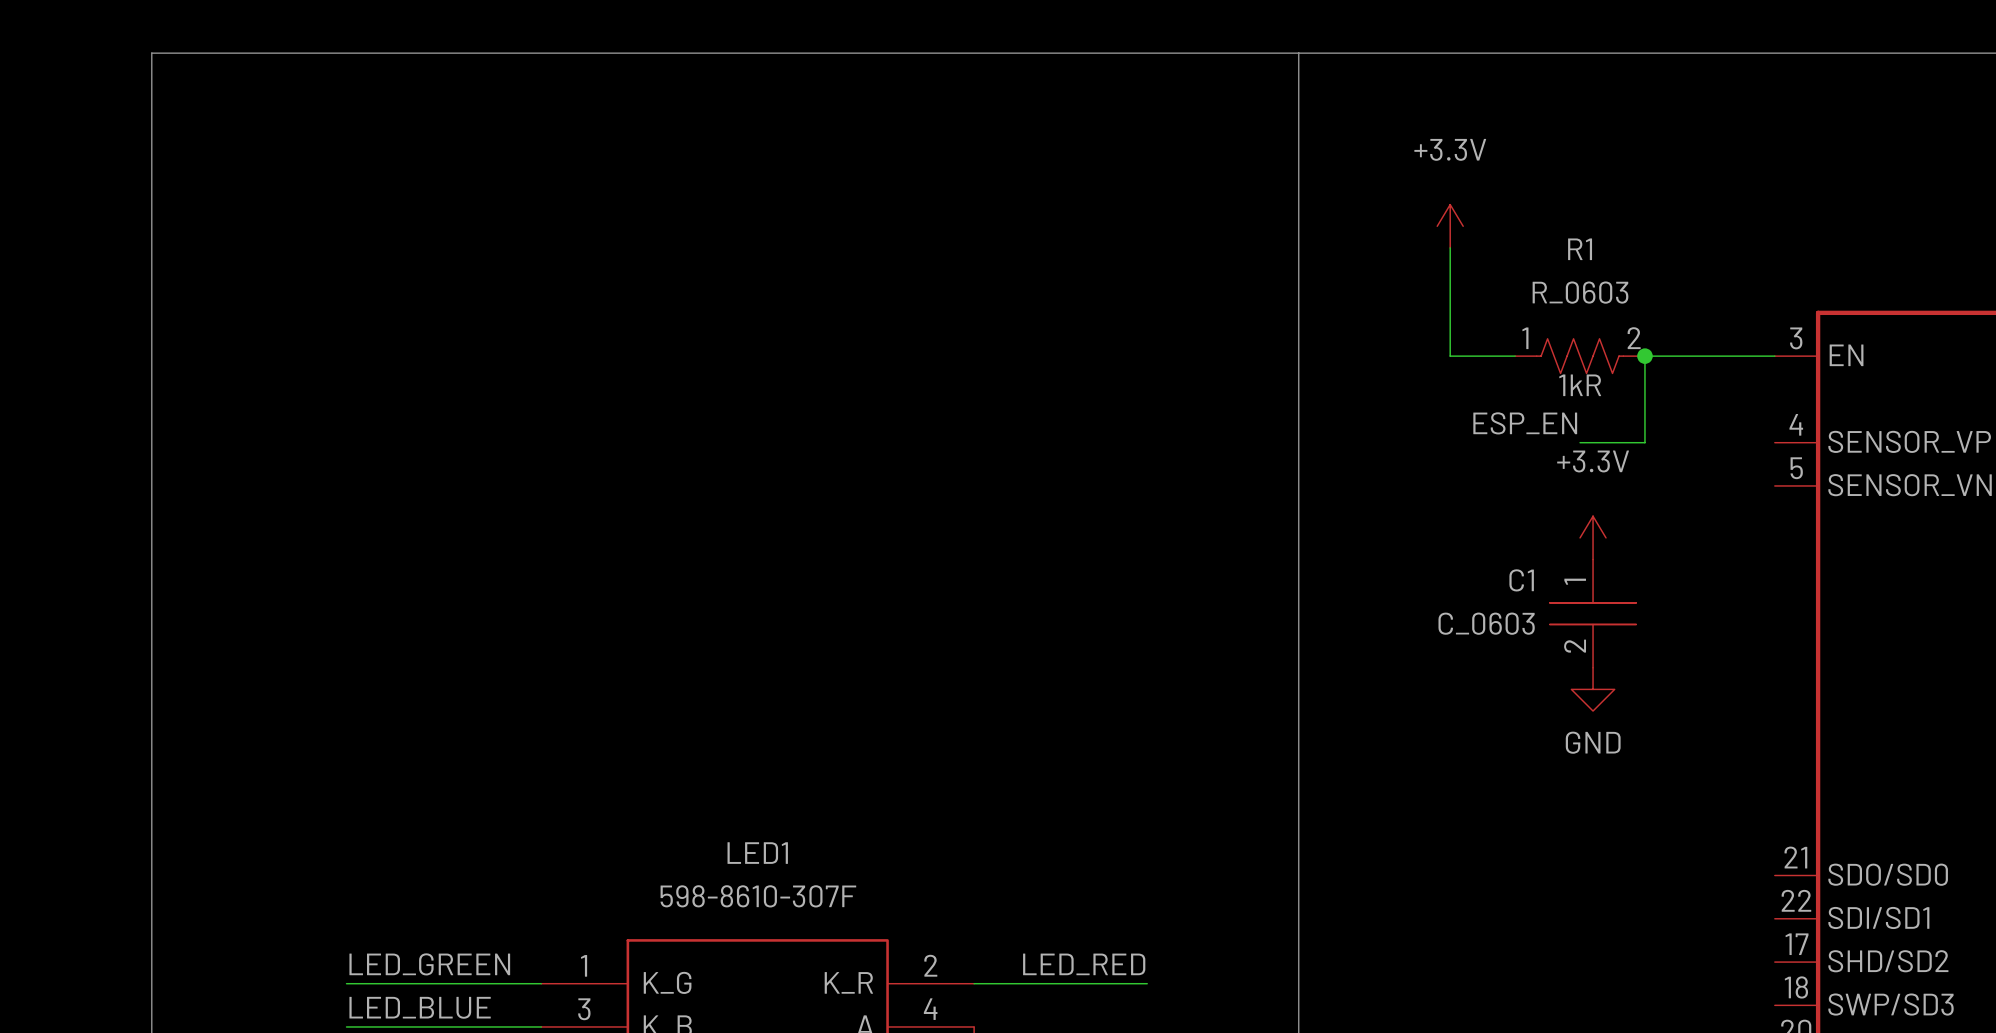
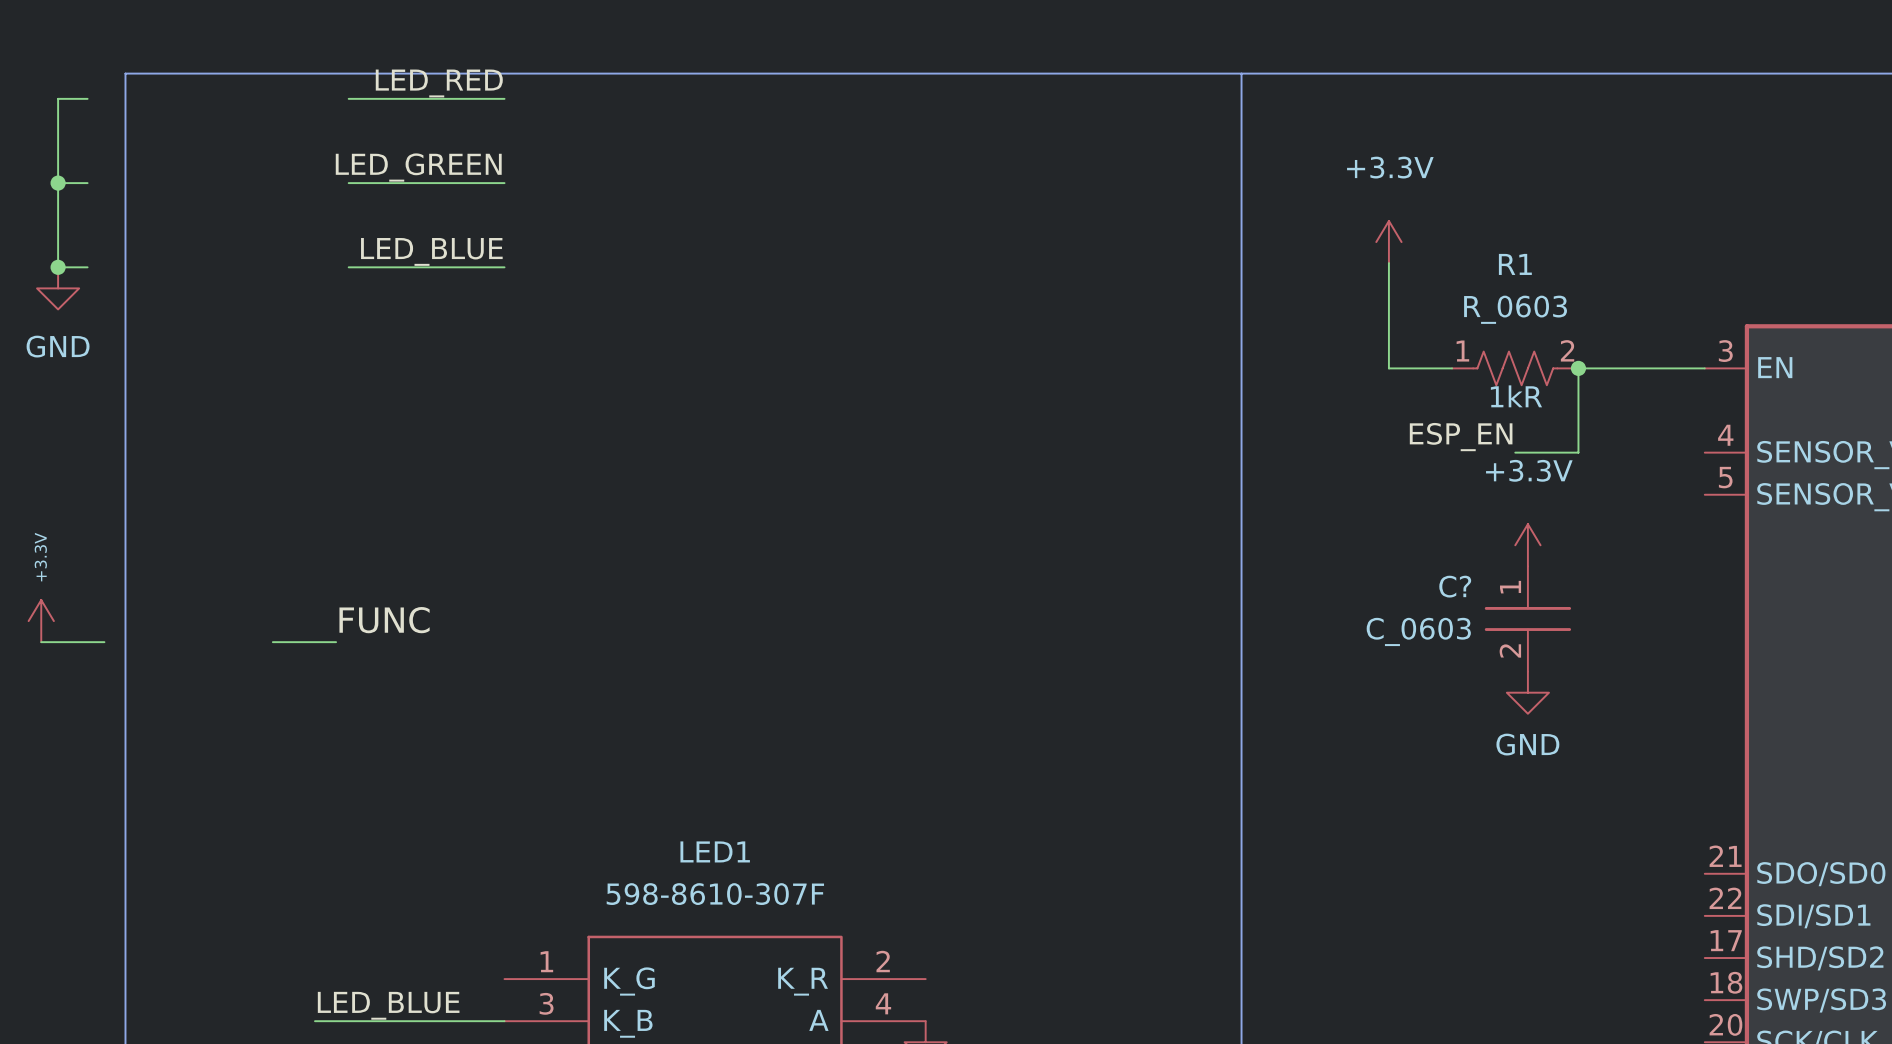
label: none -> LED_RED (439, 83)
wire: none -> (87, 98) (58, 98) (58, 267) (87, 267)
wire: none -> (348, 98) (504, 98)
label: none -> LED_GREEN (418, 167)
wire: none -> (58, 183) (87, 183)
junction: none -> (58, 183)
wire: none -> (348, 183) (504, 183)
label: none -> LED_BLUE (431, 251)
junction: none -> (58, 267)
wire: none -> (348, 267) (504, 267)
power symbol: none -> GND (58, 288)
C1 name: C1 (1521, 580) -> C? (1455, 586)
label: none -> FUNC (384, 620)
power symbol: none -> +3.3V (41, 621)
wire: none -> (41, 642) (104, 642)
wire: none -> (272, 642) (336, 642)
label: LED_GREEN (429, 964) -> none
label: LED_RED (1084, 964) -> none
wire: (346, 983) (541, 983) -> none
wire: (974, 983) (1147, 983) -> none

